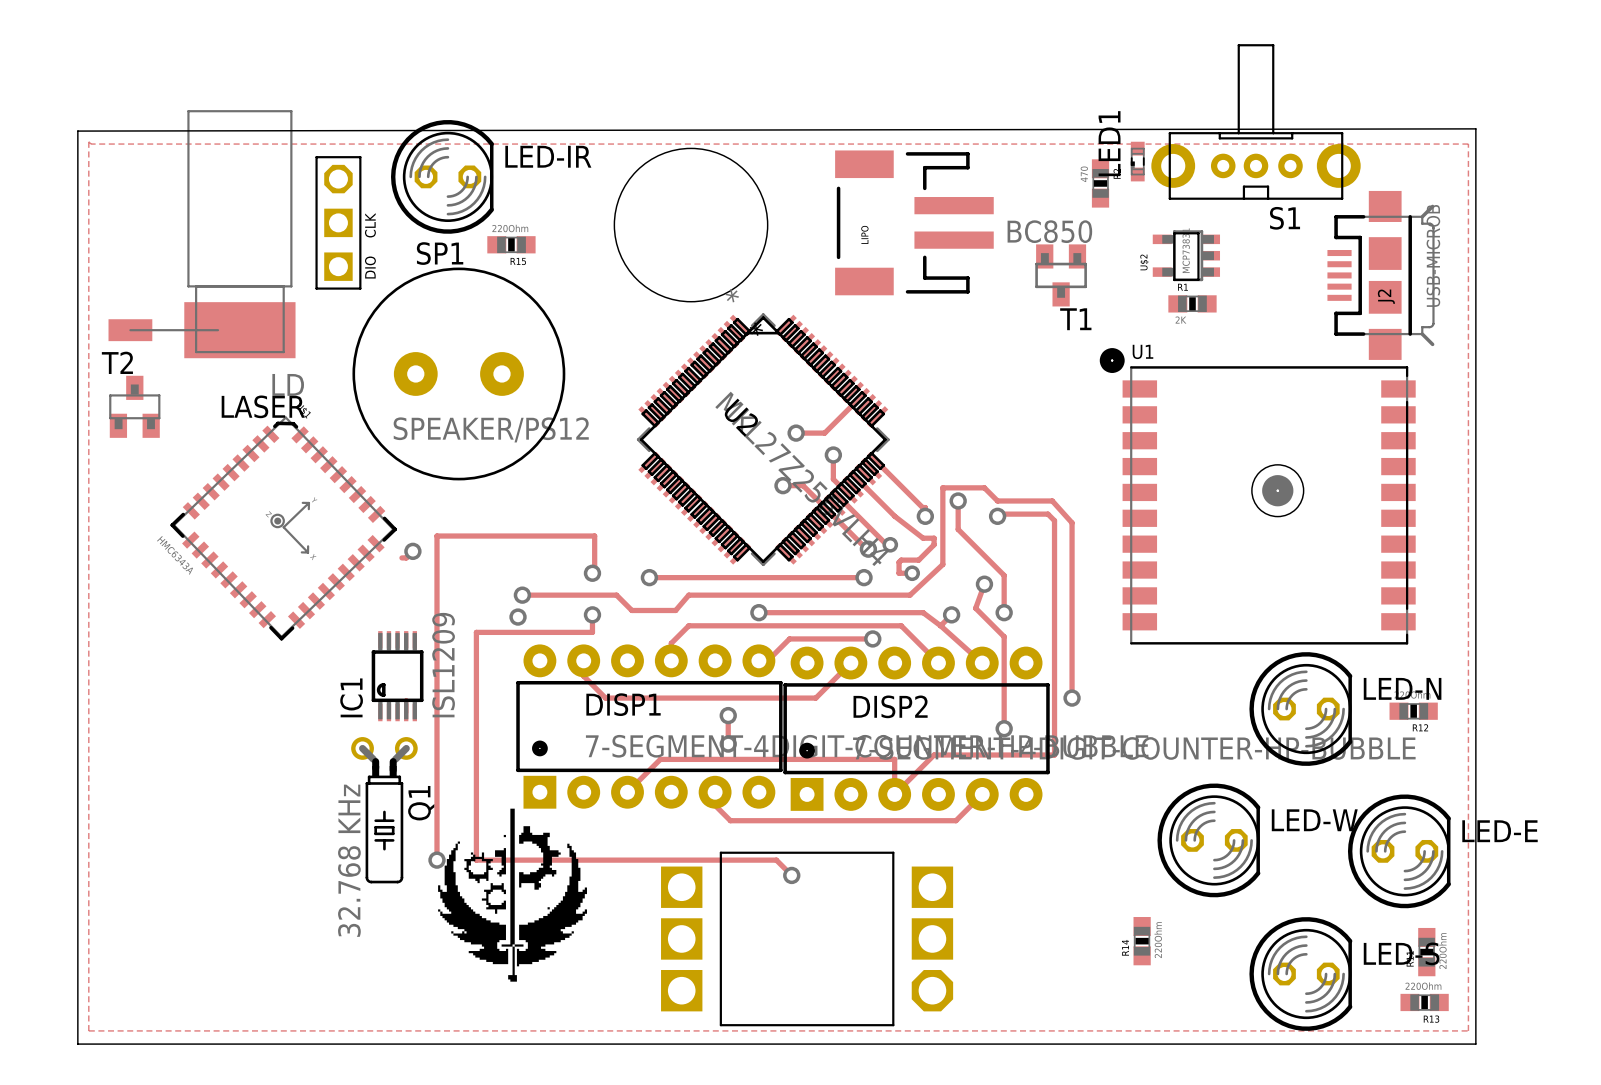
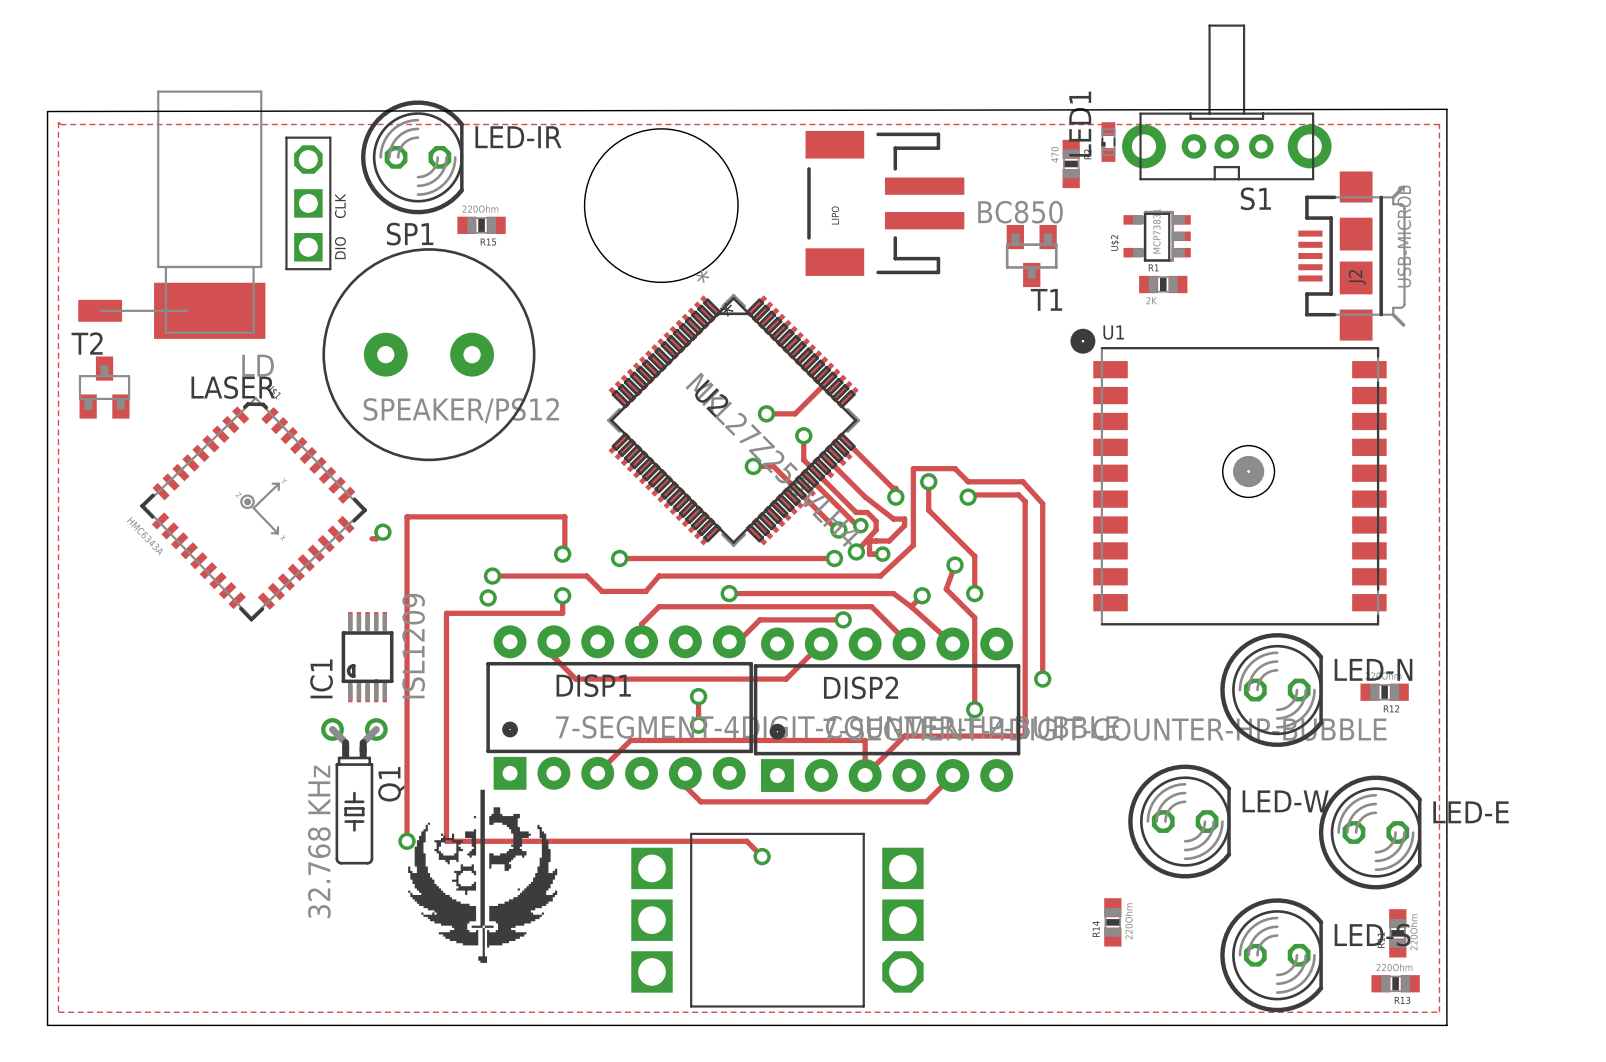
track: none -> (817, 473) (856, 512) (867, 512) (876, 521) (876, 530) (856, 551)
via: none -> (856, 551)

